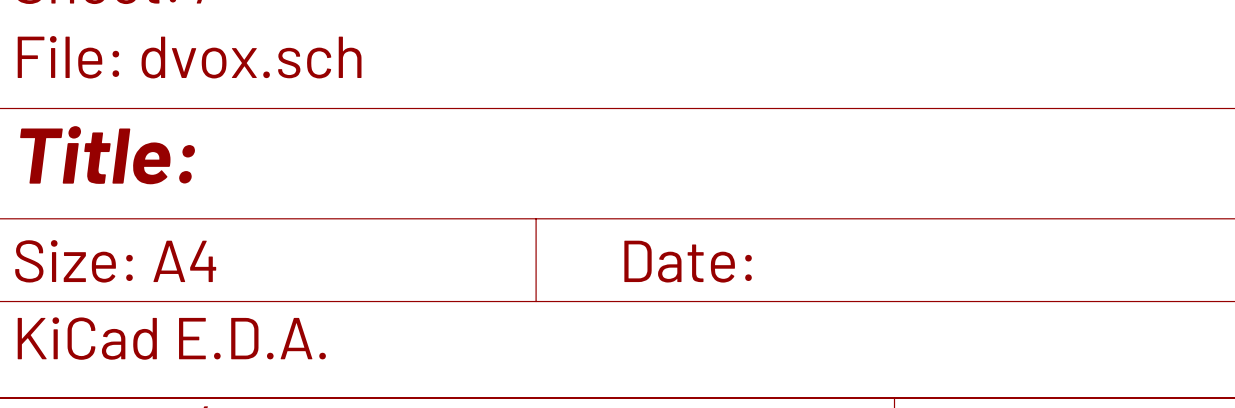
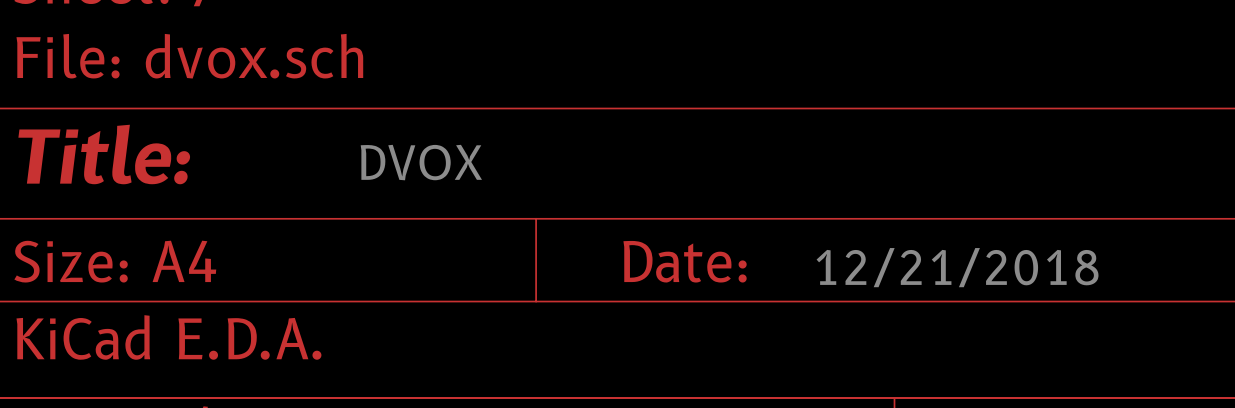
text: none -> DVOX (421, 162)
text: none -> 12/21/2018 (957, 267)

